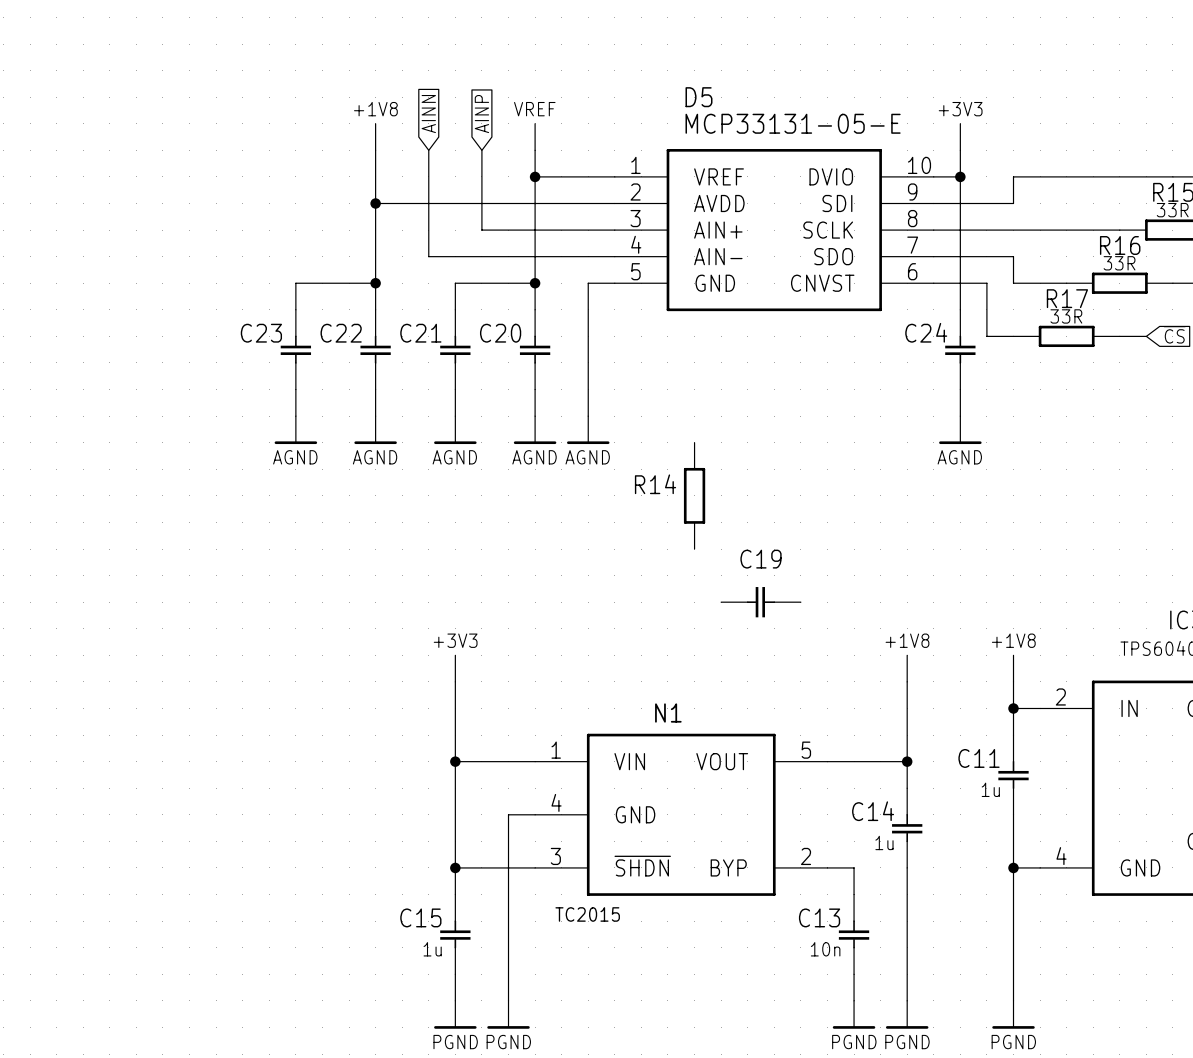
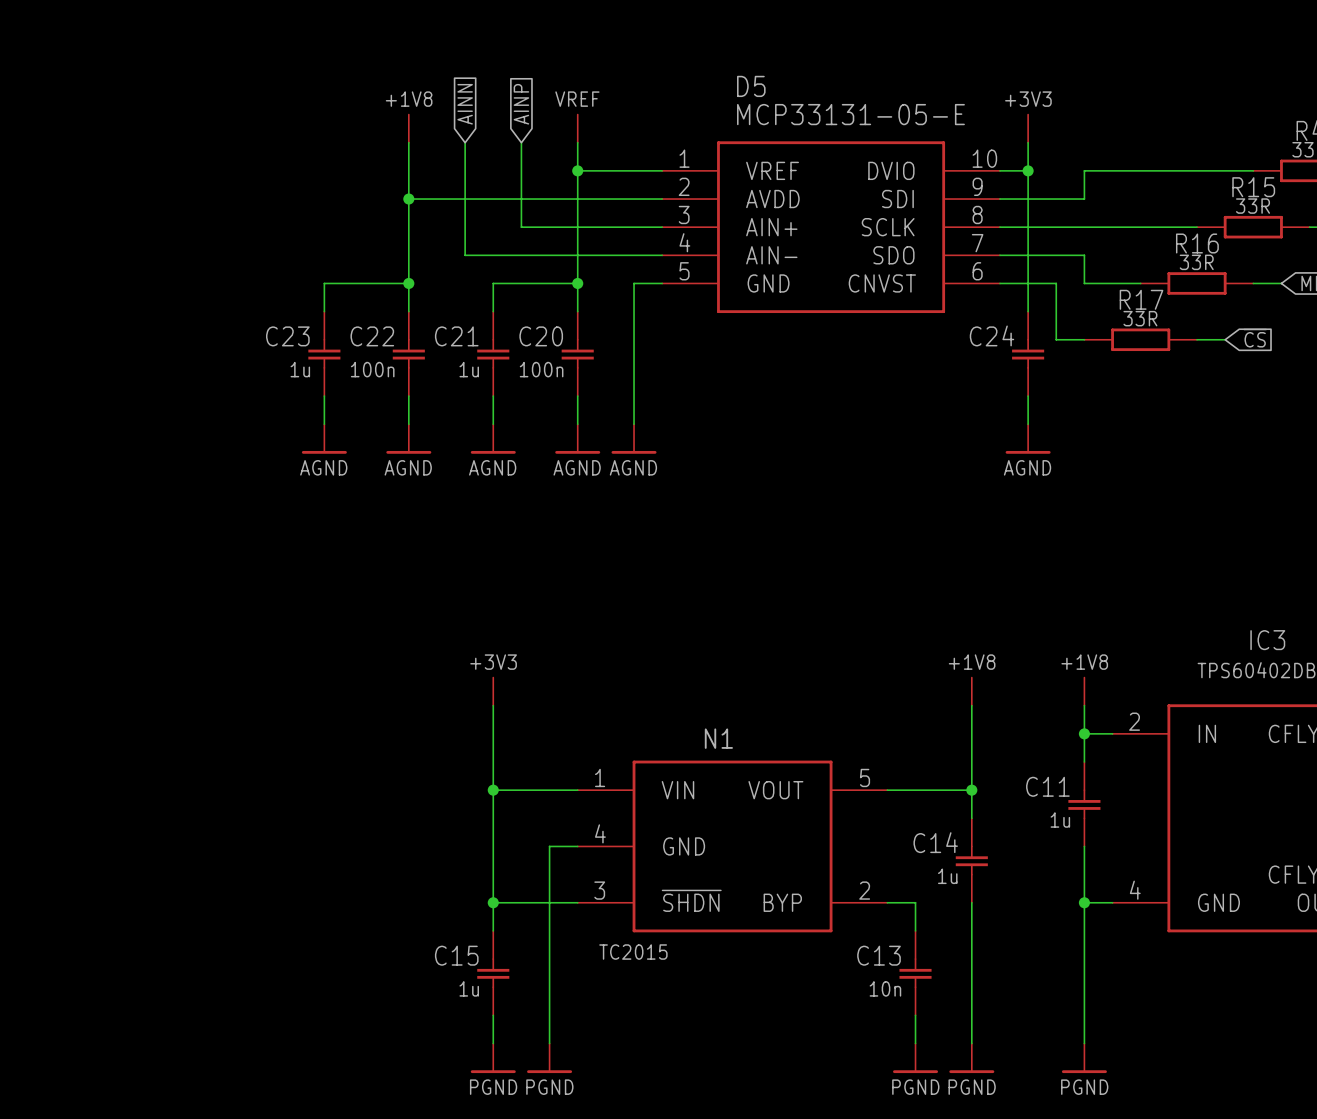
C23 value: none -> 1u (300, 369)
C22 value: none -> 100n (372, 369)
C21 value: none -> 1u (469, 369)
C20 value: none -> 100n (541, 369)
R14: (694, 495) -> none
C19: (761, 602) -> none

